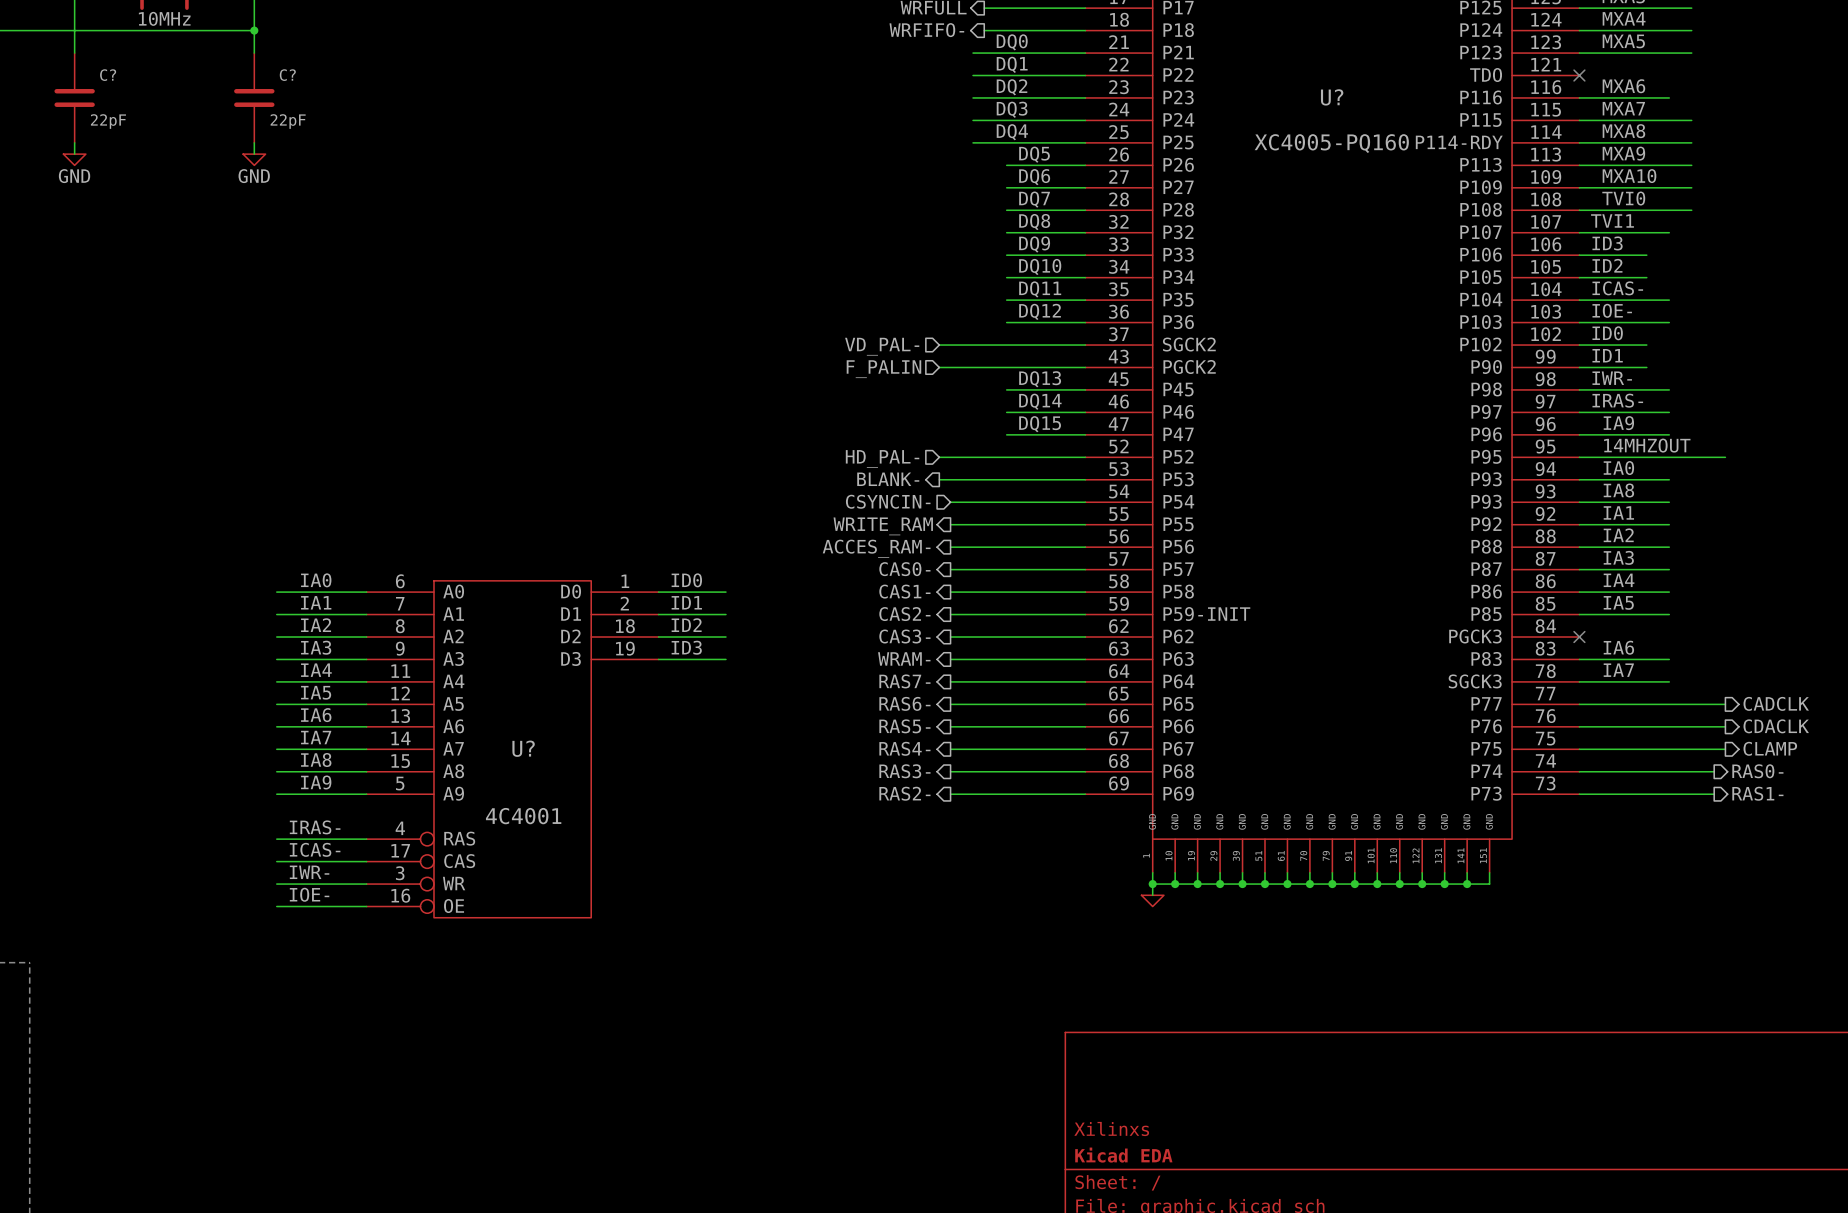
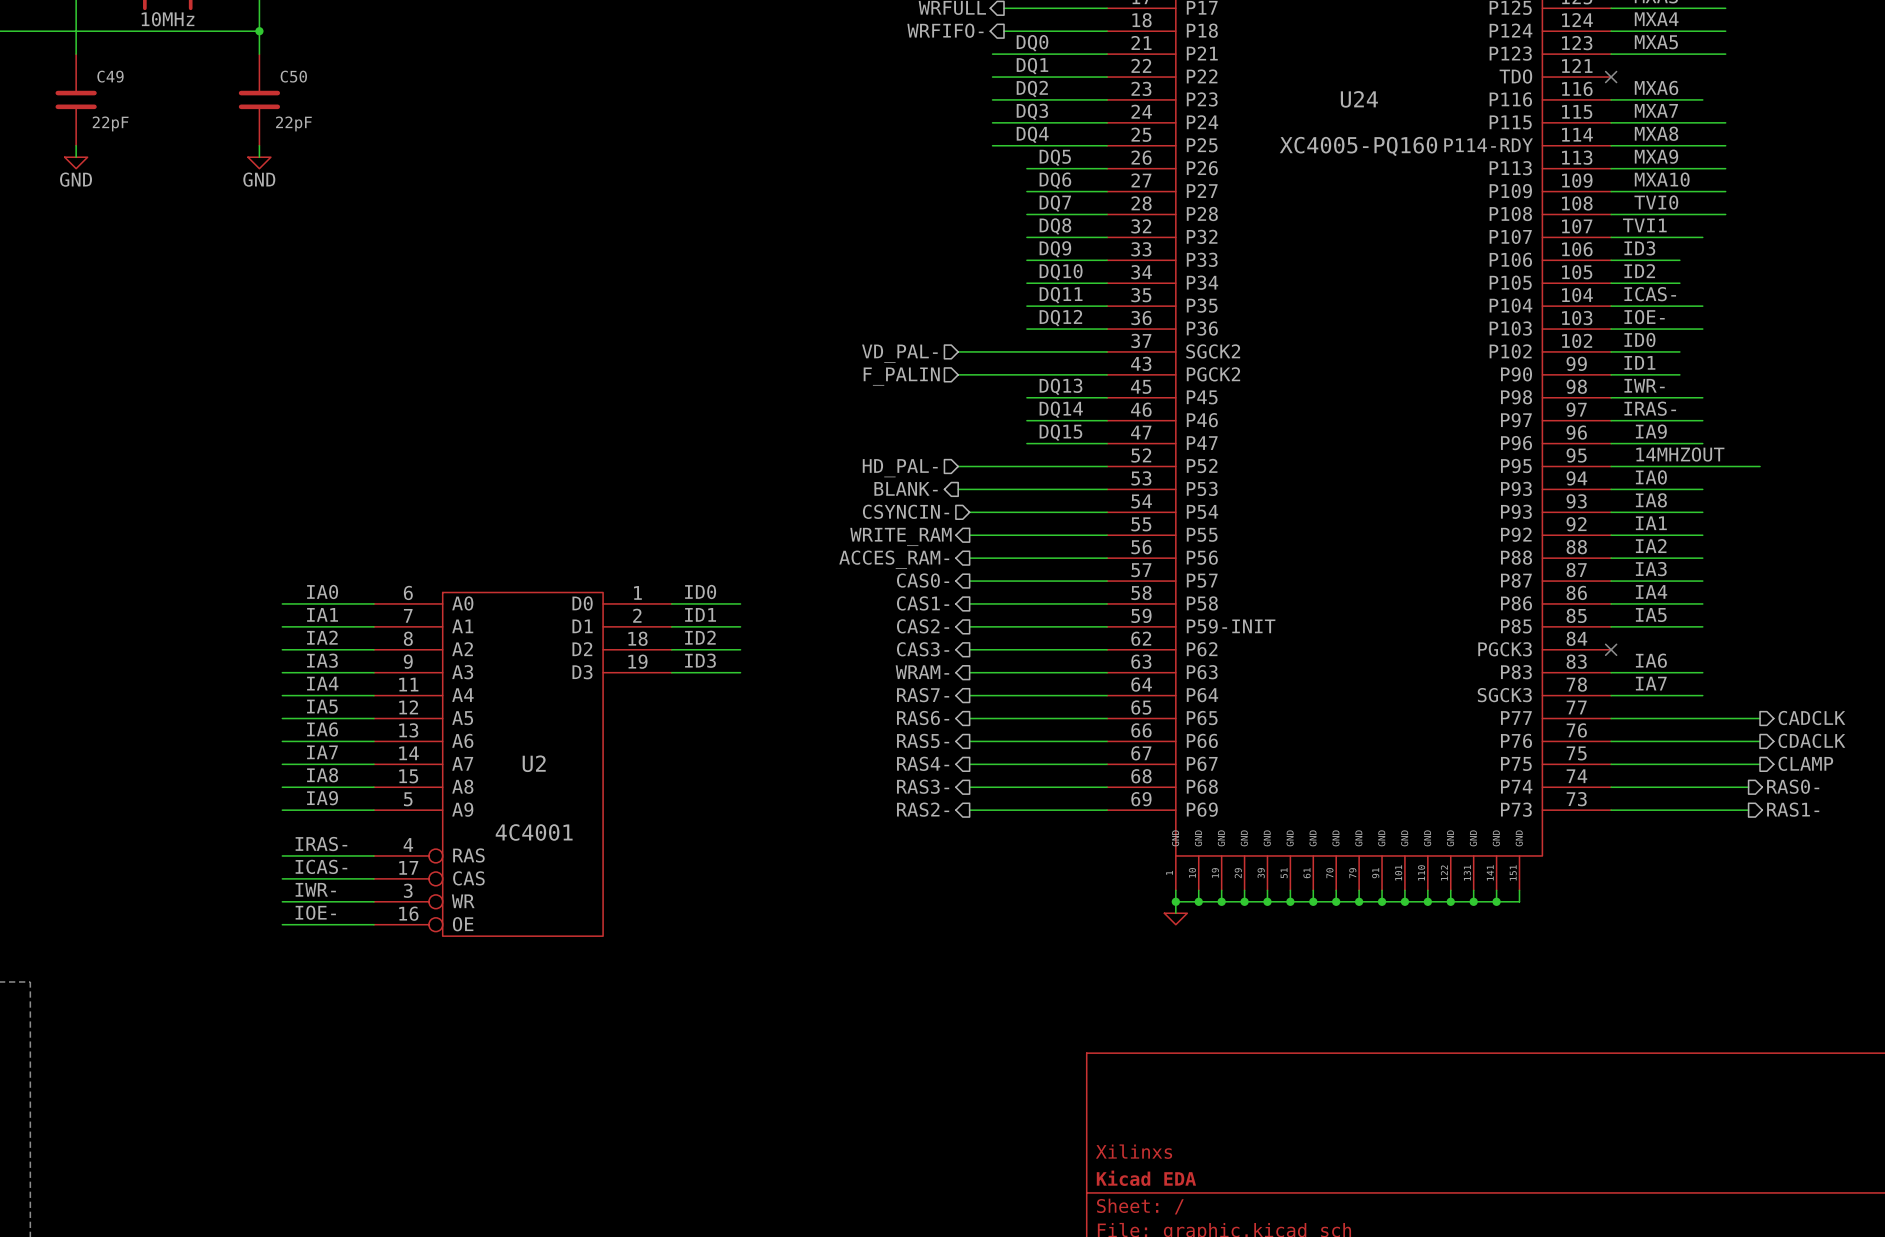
C? name: C? (108, 75) -> C49 (110, 76)
C? name: C? (287, 75) -> C50 (293, 76)
U? name: U? (1332, 97) -> U24 (1359, 99)
U? name: U? (523, 748) -> U2 (534, 763)

